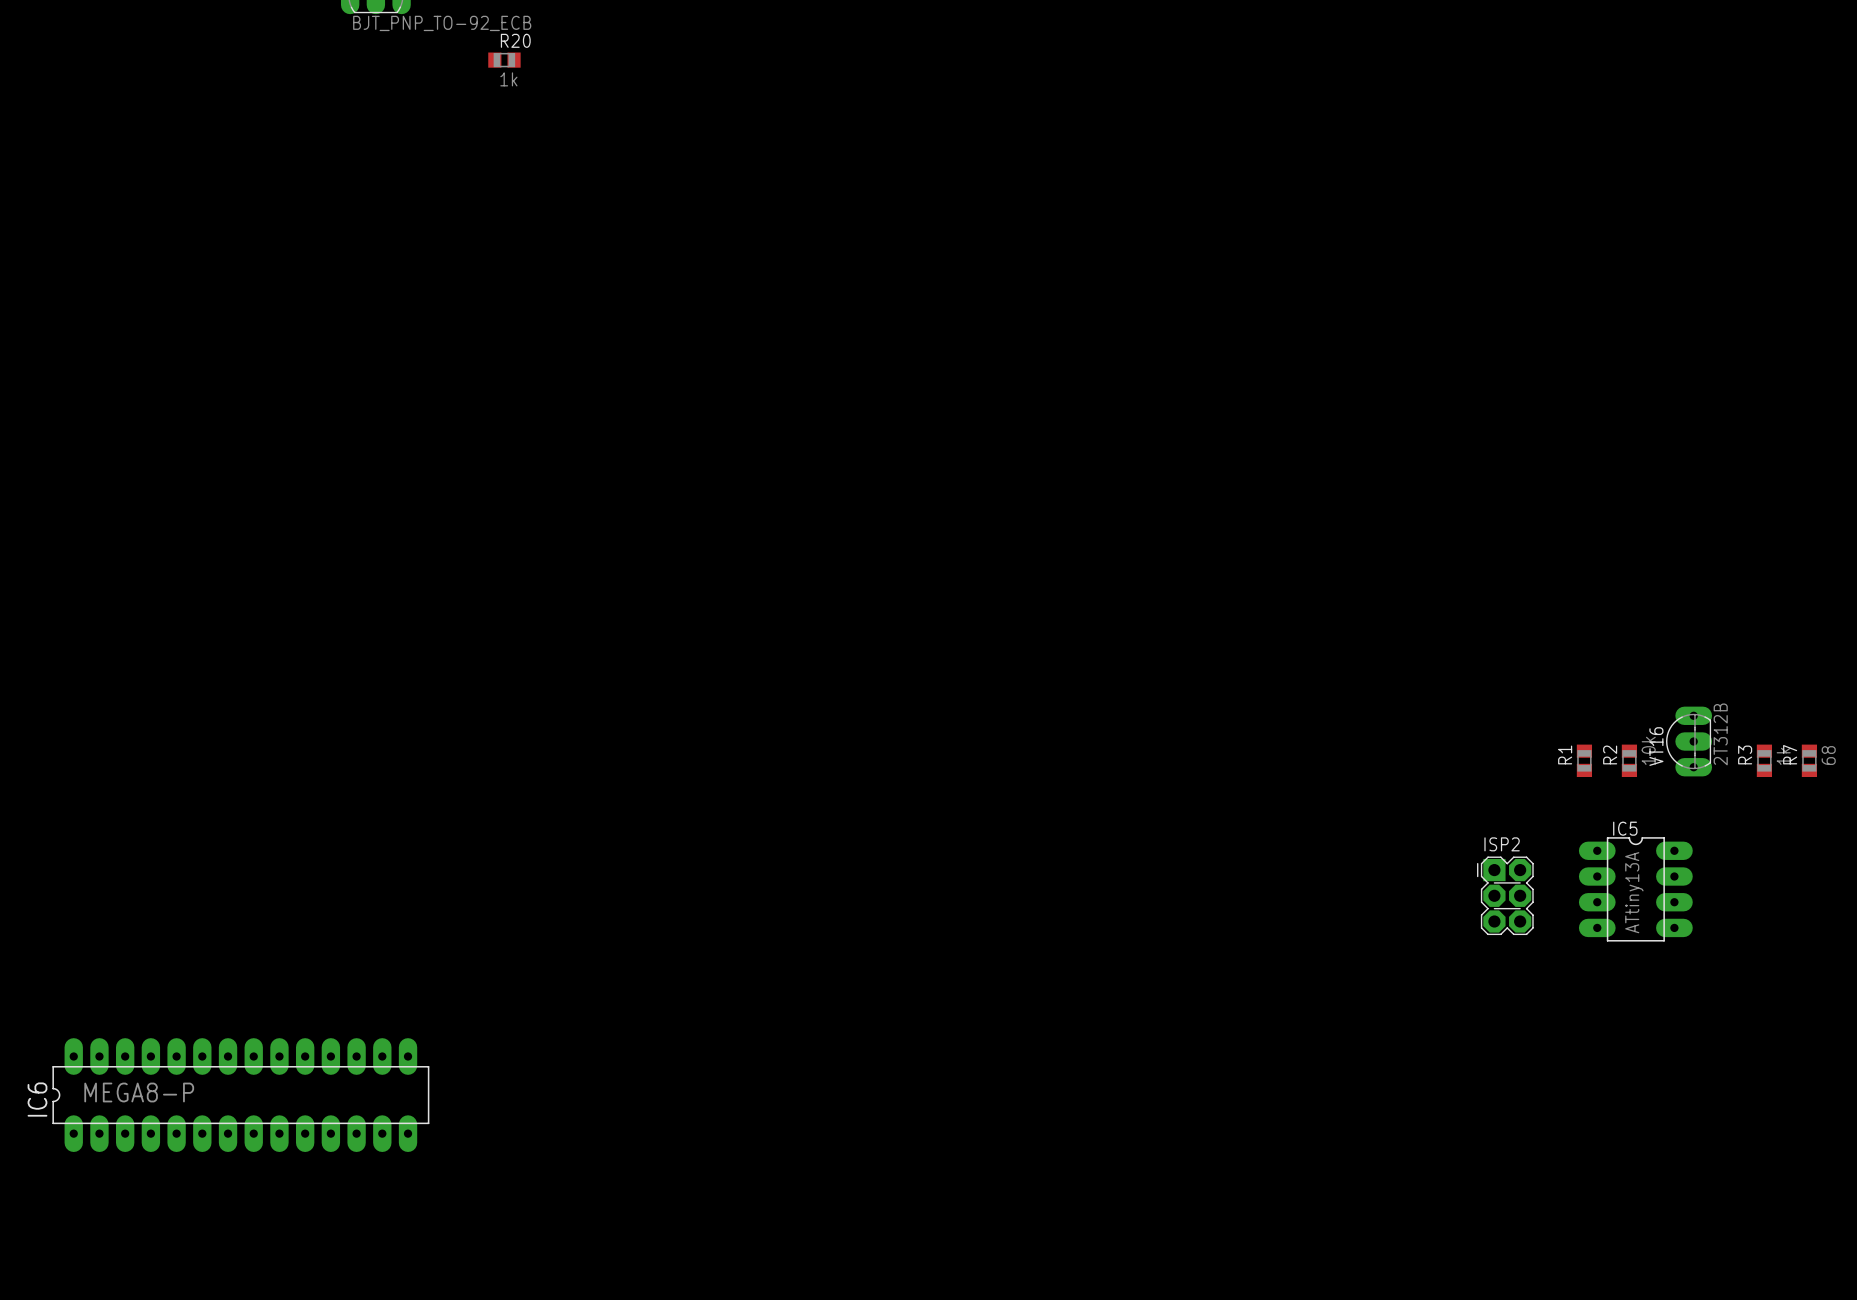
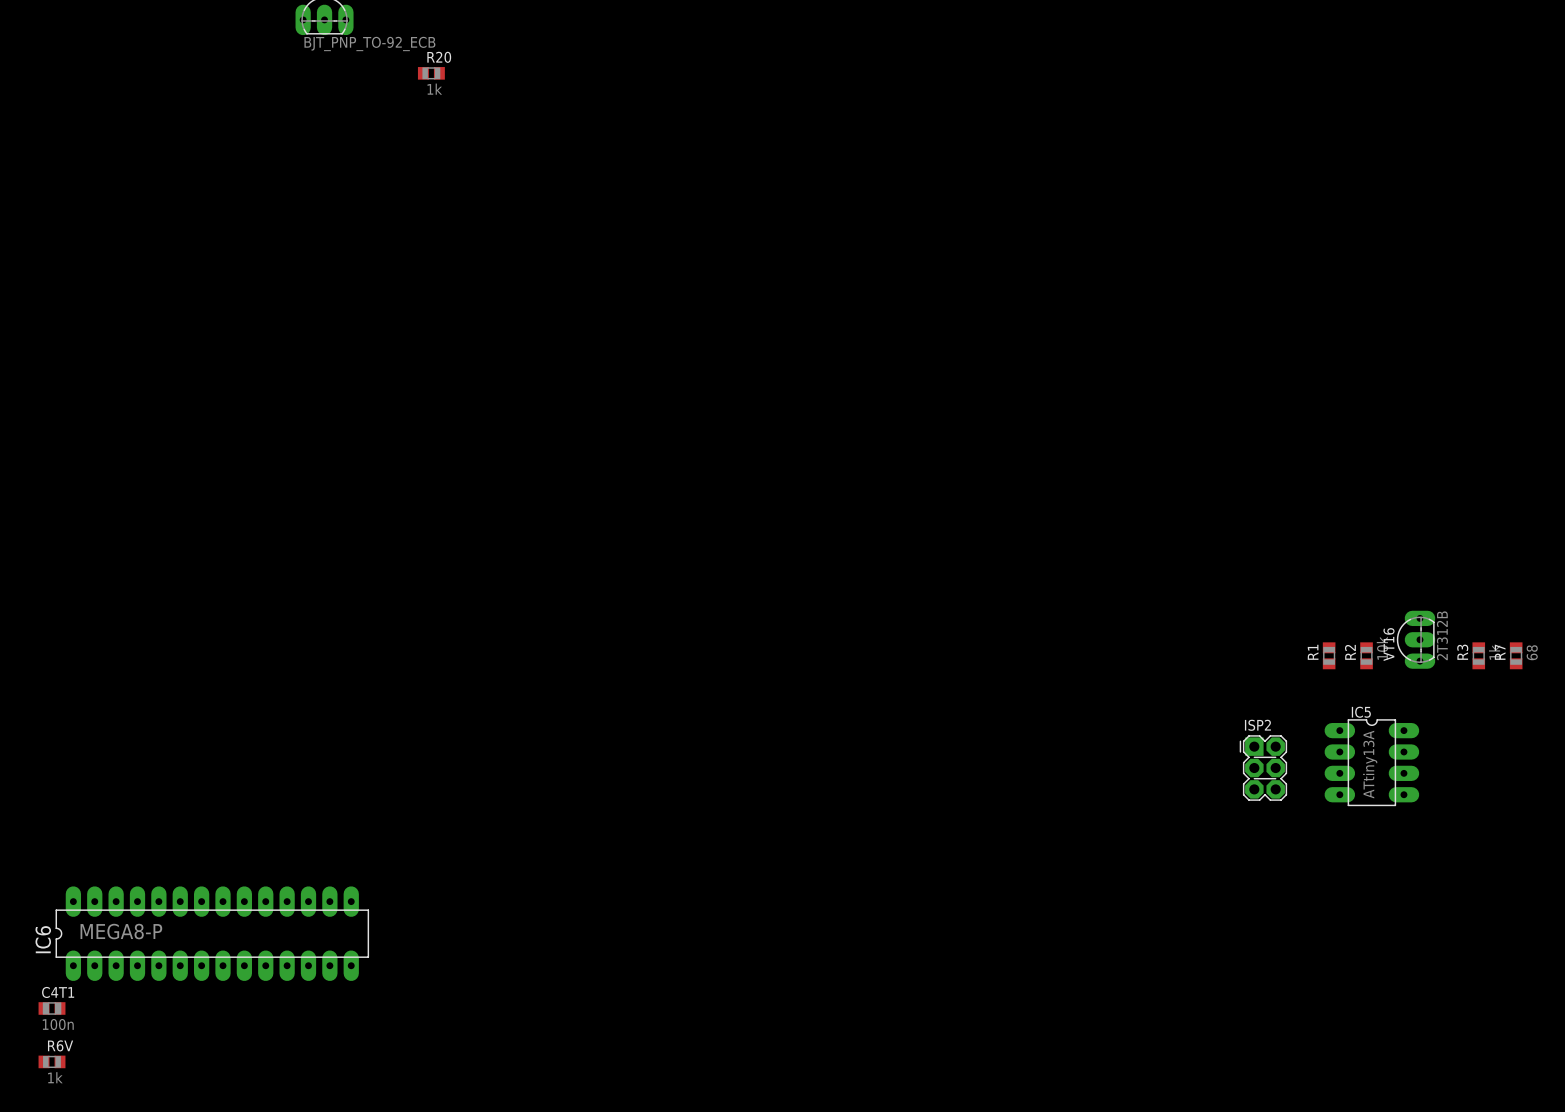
C4T1: none -> 100n (52, 1008)
R6V: none -> 1k (52, 1061)

